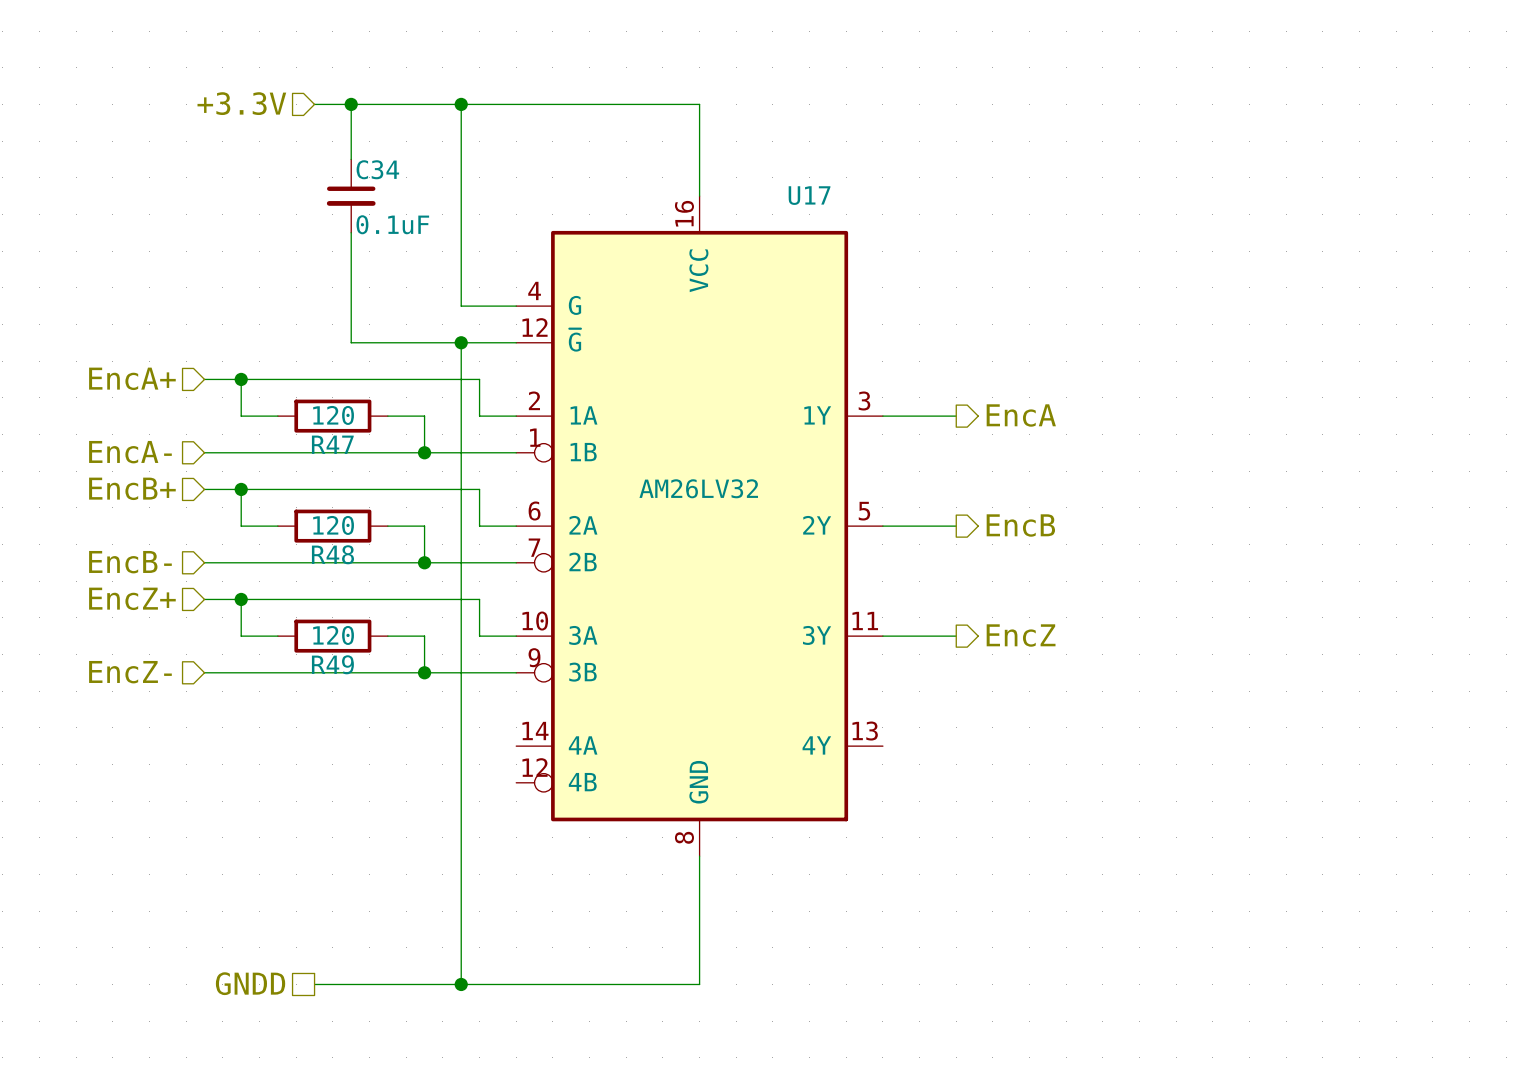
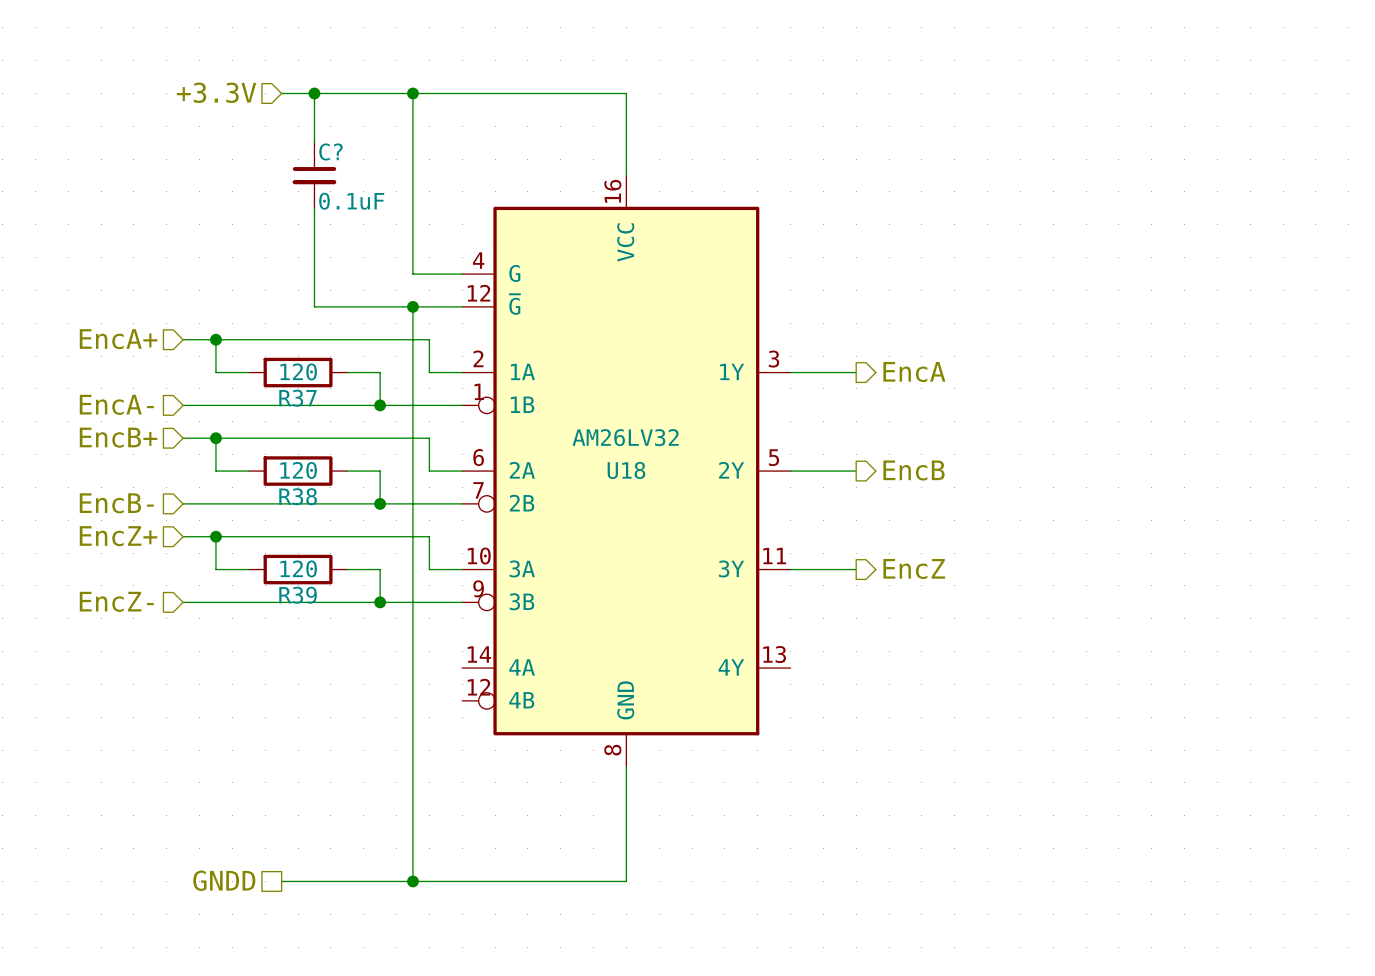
C34 name: C34 (377, 169) -> C? (331, 151)
U17 name: U17 (809, 195) -> U18 (626, 470)
R47 name: R47 (332, 444) -> R37 (297, 398)
R48 name: R48 (332, 554) -> R38 (298, 496)
R49 name: R49 (332, 664) -> R39 (298, 595)

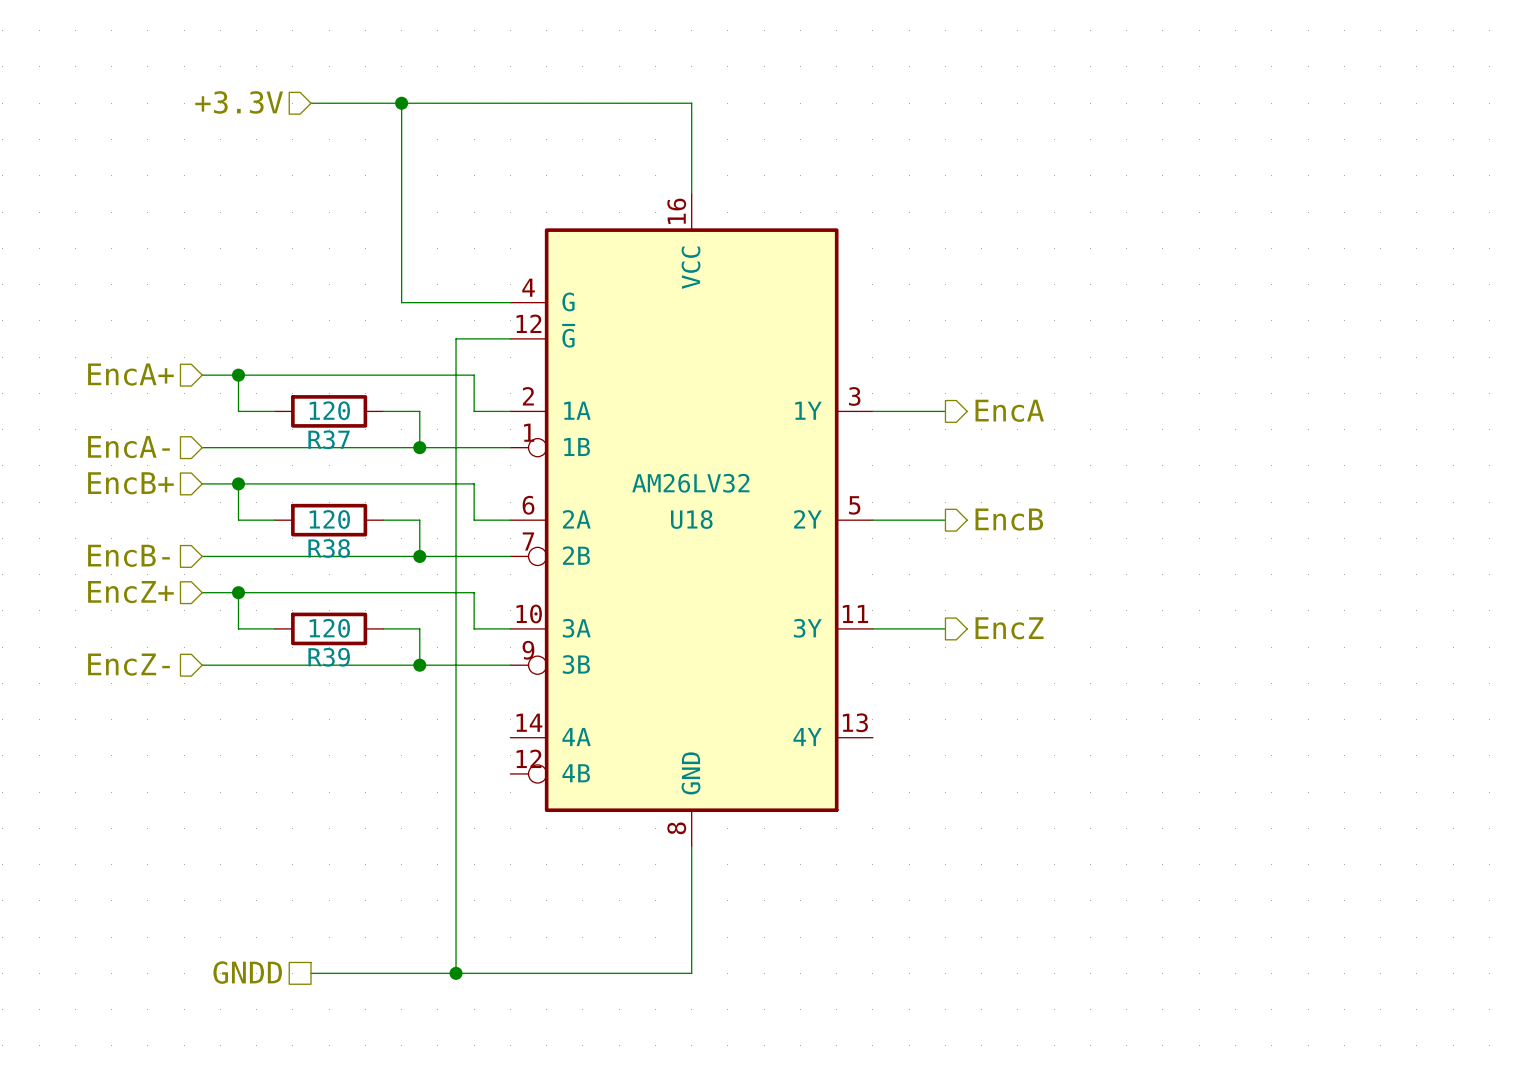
wire: (314, 93) (314, 142) -> none
junction: (314, 93) -> none
junction: none -> (401, 103)
wire: (412, 93) (412, 274) -> (401, 103) (401, 302) (456, 302)
junction: (412, 93) -> none
C?: 0.1uF (314, 175) -> none
wire: (314, 208) (314, 306) (412, 306) -> none
junction: (412, 306) -> none

